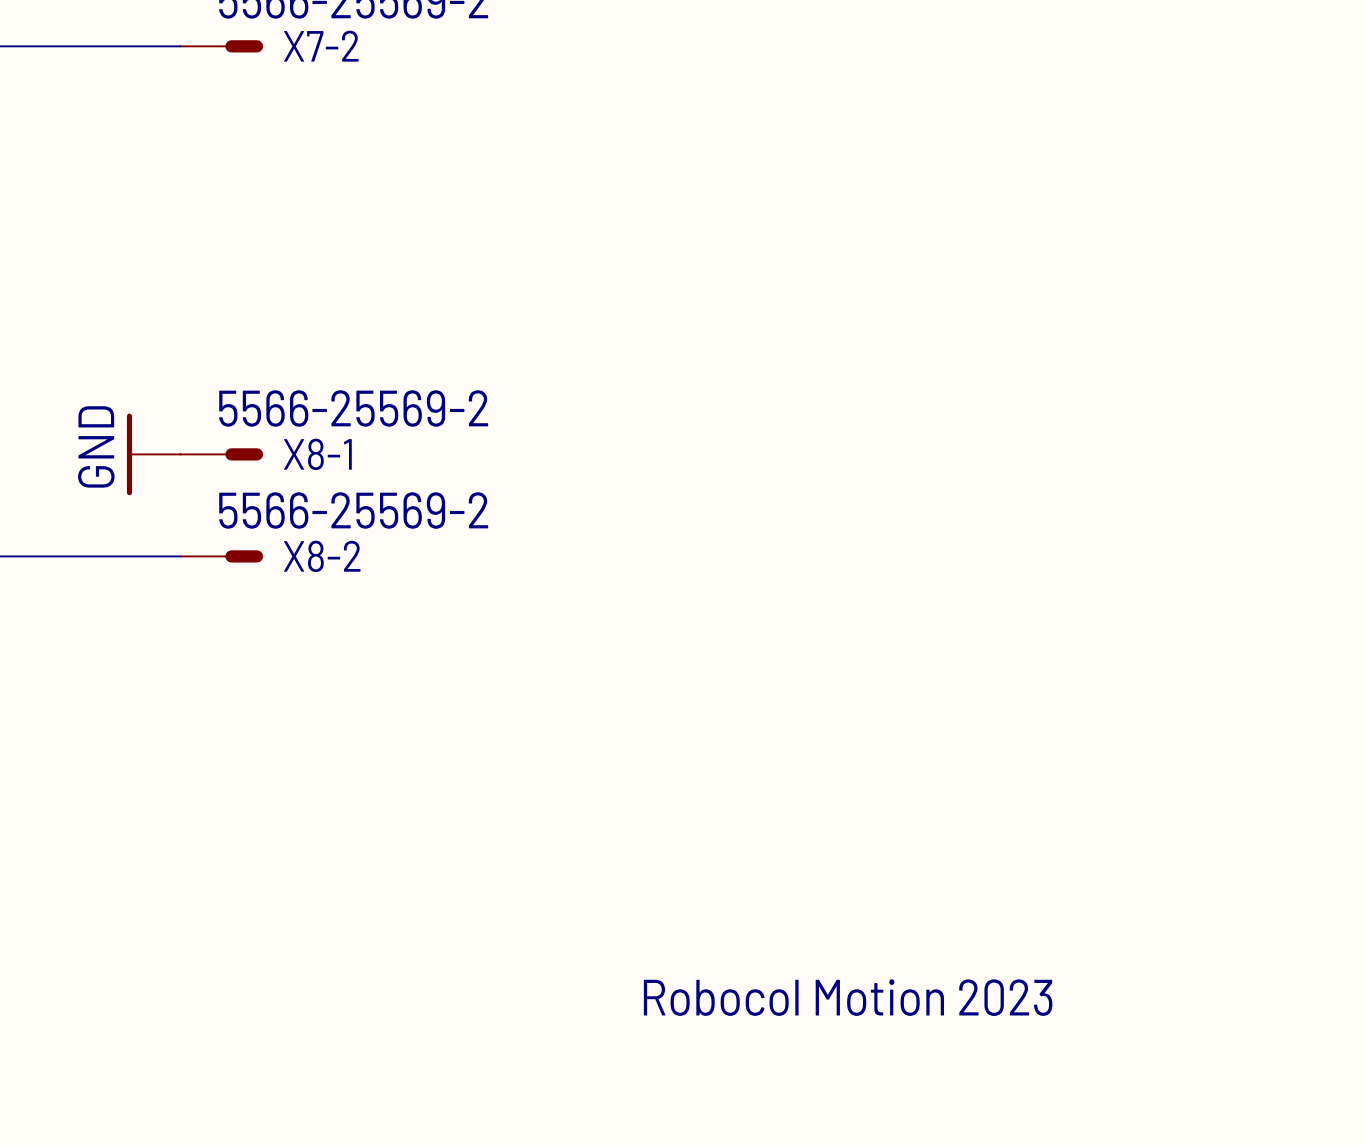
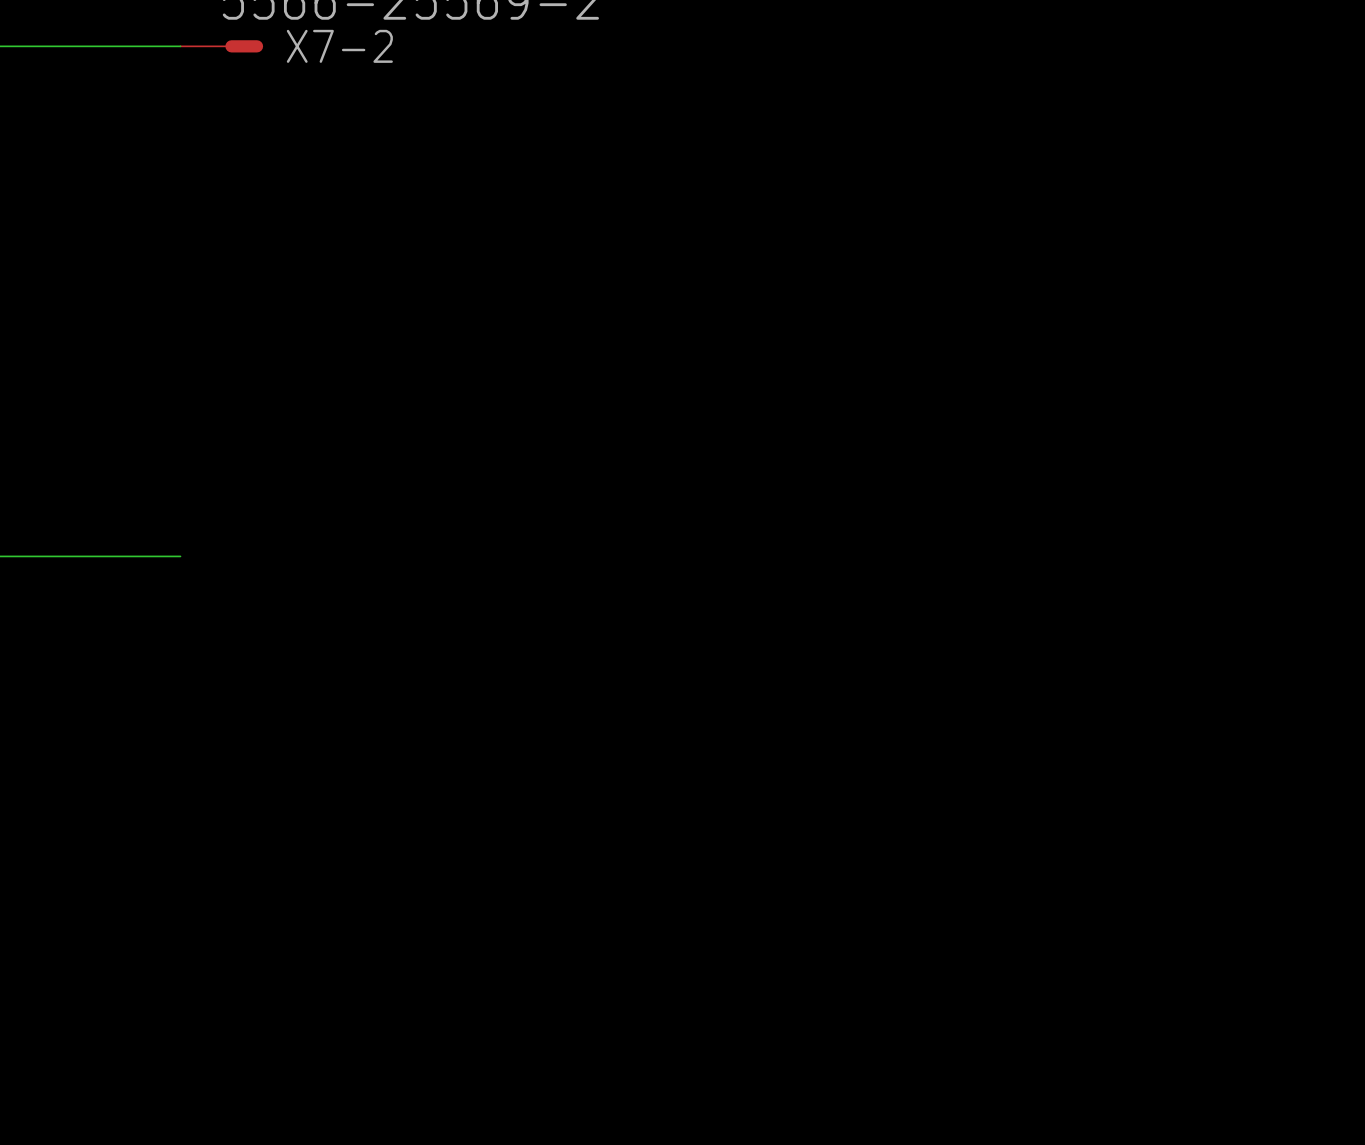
power symbol: GND (153, 454) -> none
X8-1: 5566-25569-2 (221, 454) -> none
X8-2: 5566-25569-2 (221, 556) -> none
text: Robocol Motion 2023 (848, 997) -> none

